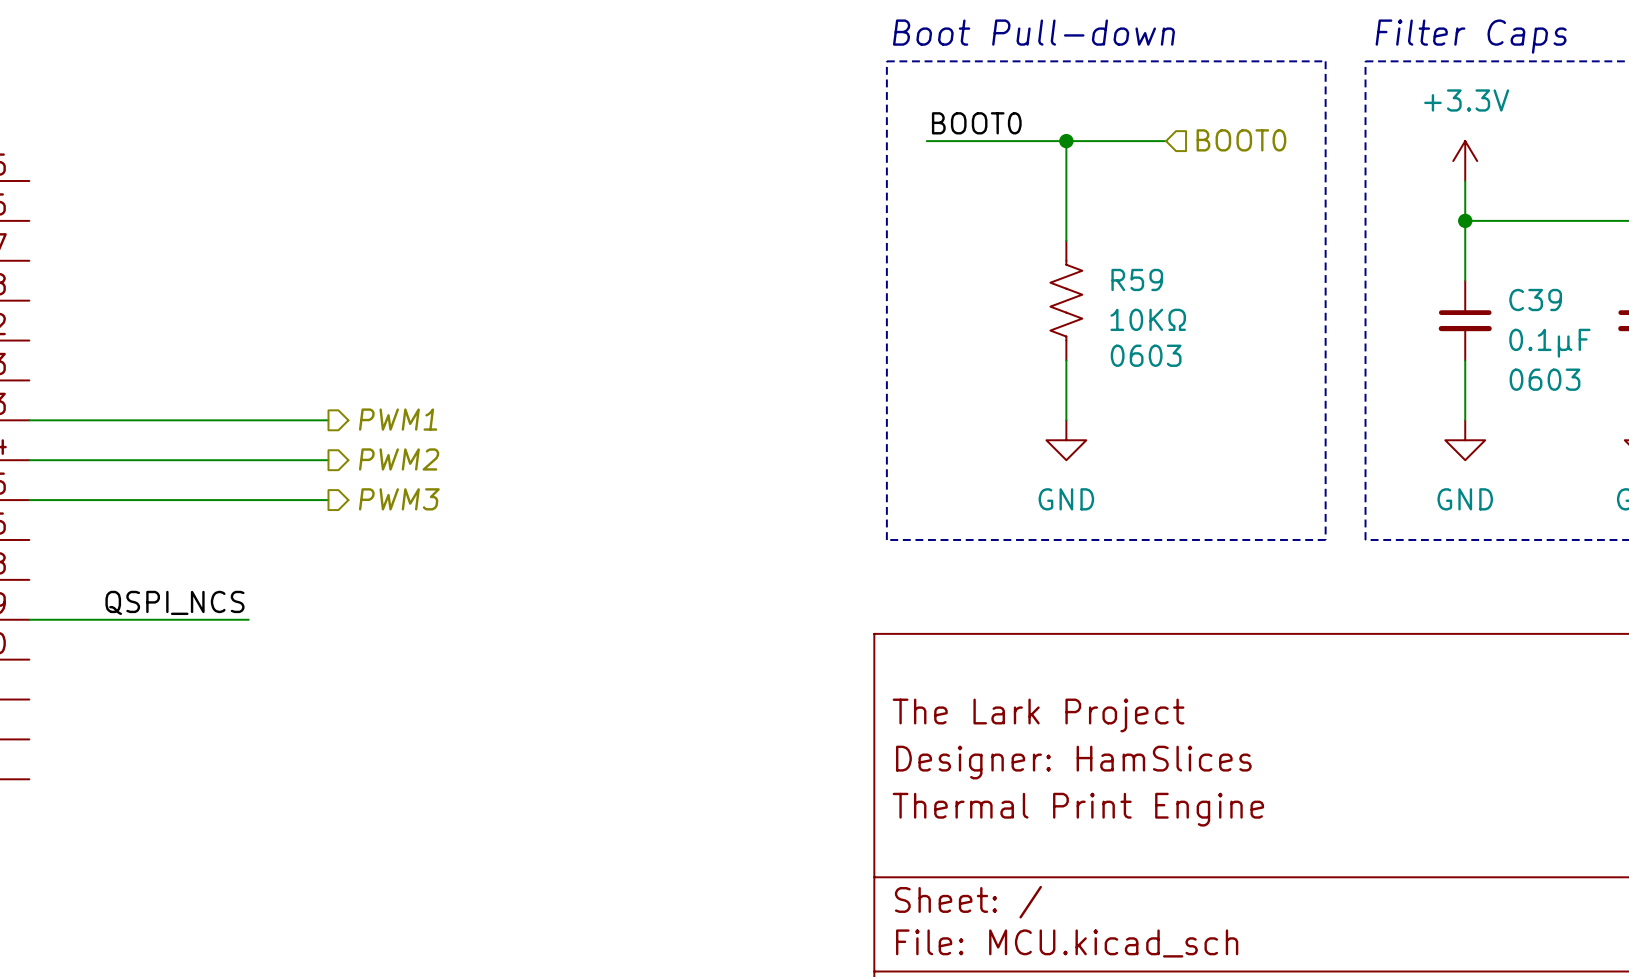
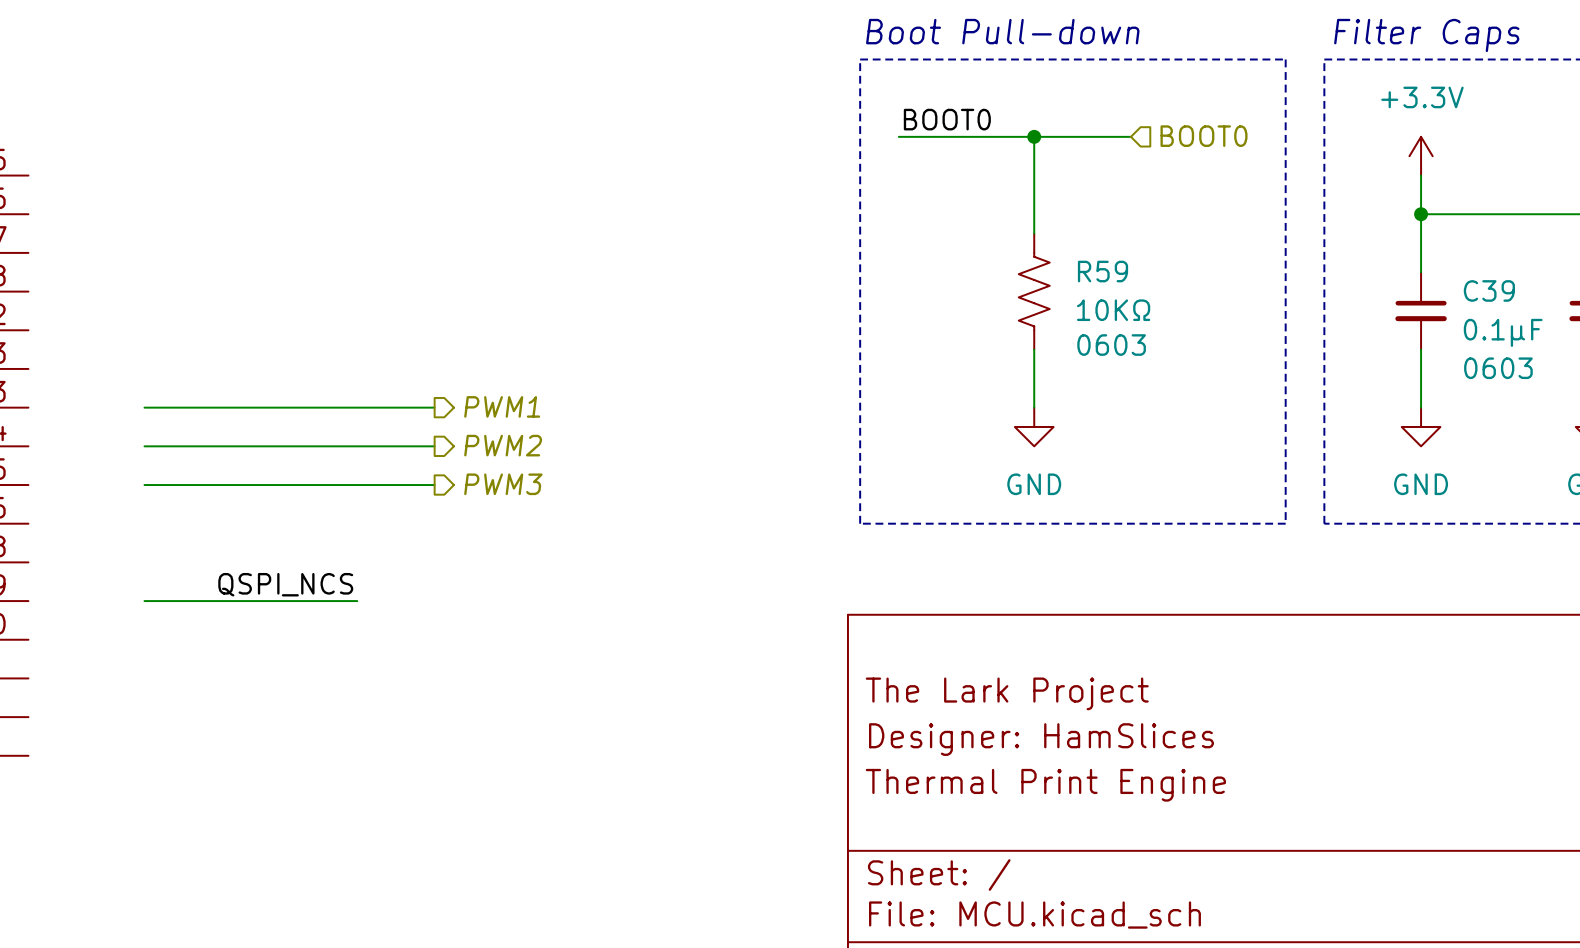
hierarchical label position: PWM1 (398, 419) -> PWM1 (502, 406)
wire: (29, 420) (148, 420) -> (318, 407) (434, 407)
hierarchical label position: PWM2 (399, 459) -> PWM2 (503, 445)
wire: (29, 460) (148, 460) -> (318, 446) (434, 446)
hierarchical label position: PWM3 (399, 499) -> PWM3 (503, 484)
wire: (29, 500) (148, 500) -> (318, 485) (434, 485)
label position: QSPI_NCS (174, 602) -> QSPI_NCS (285, 584)
wire: (29, 619) (148, 619) -> (241, 601) (357, 601)

